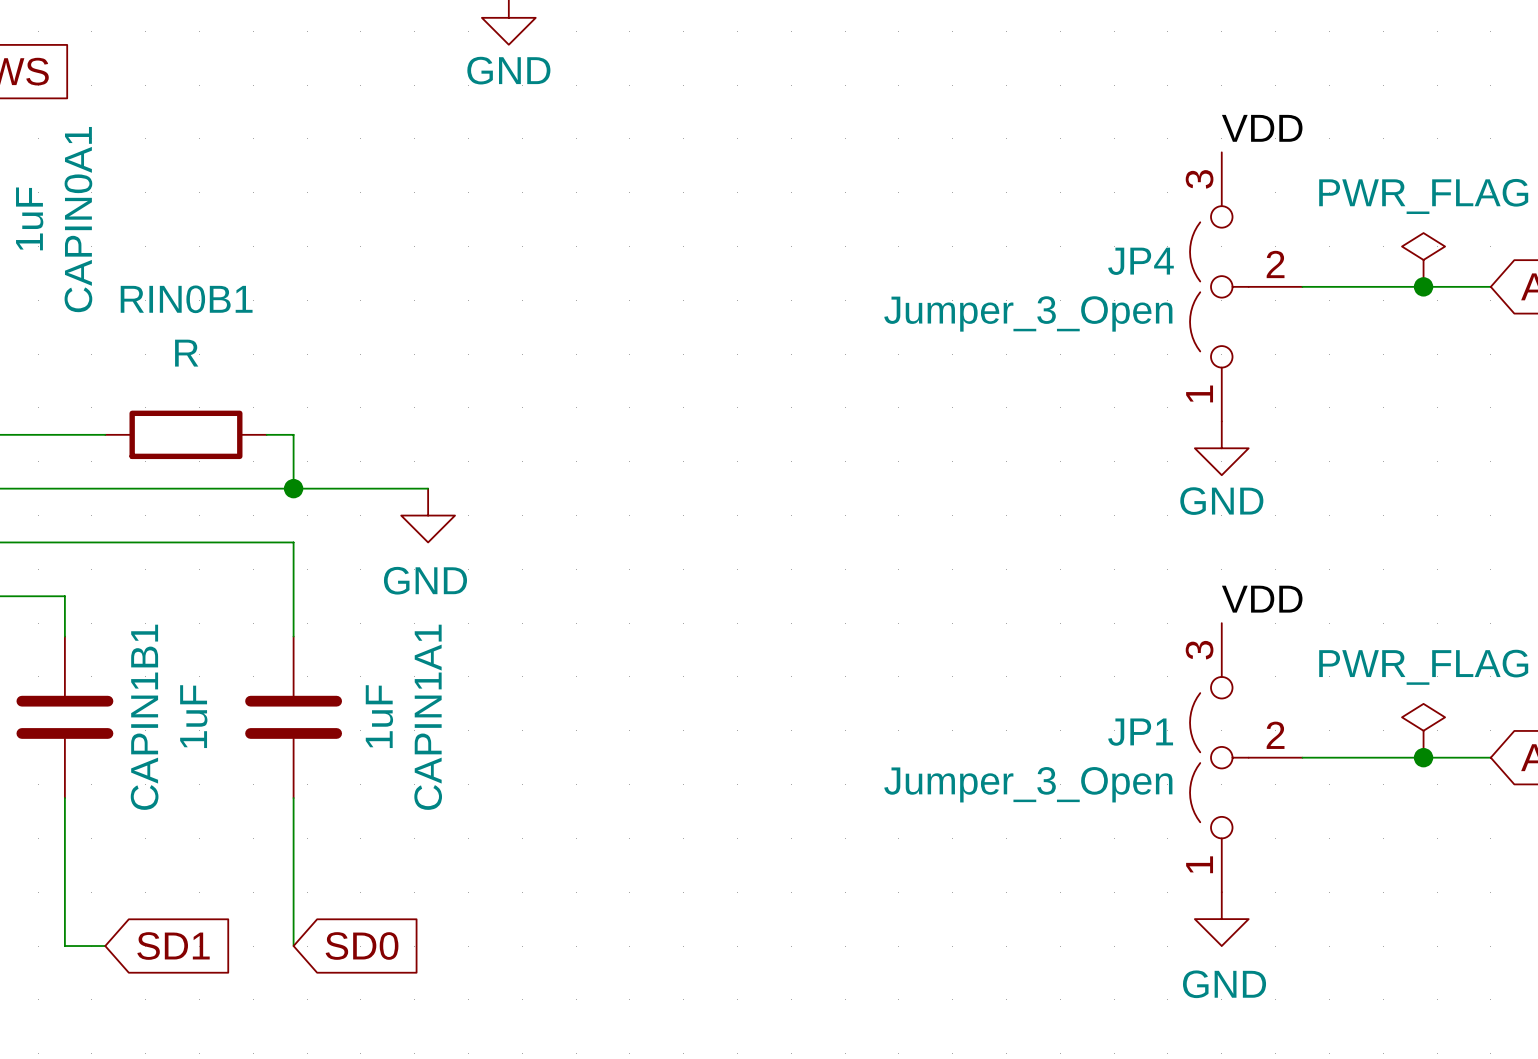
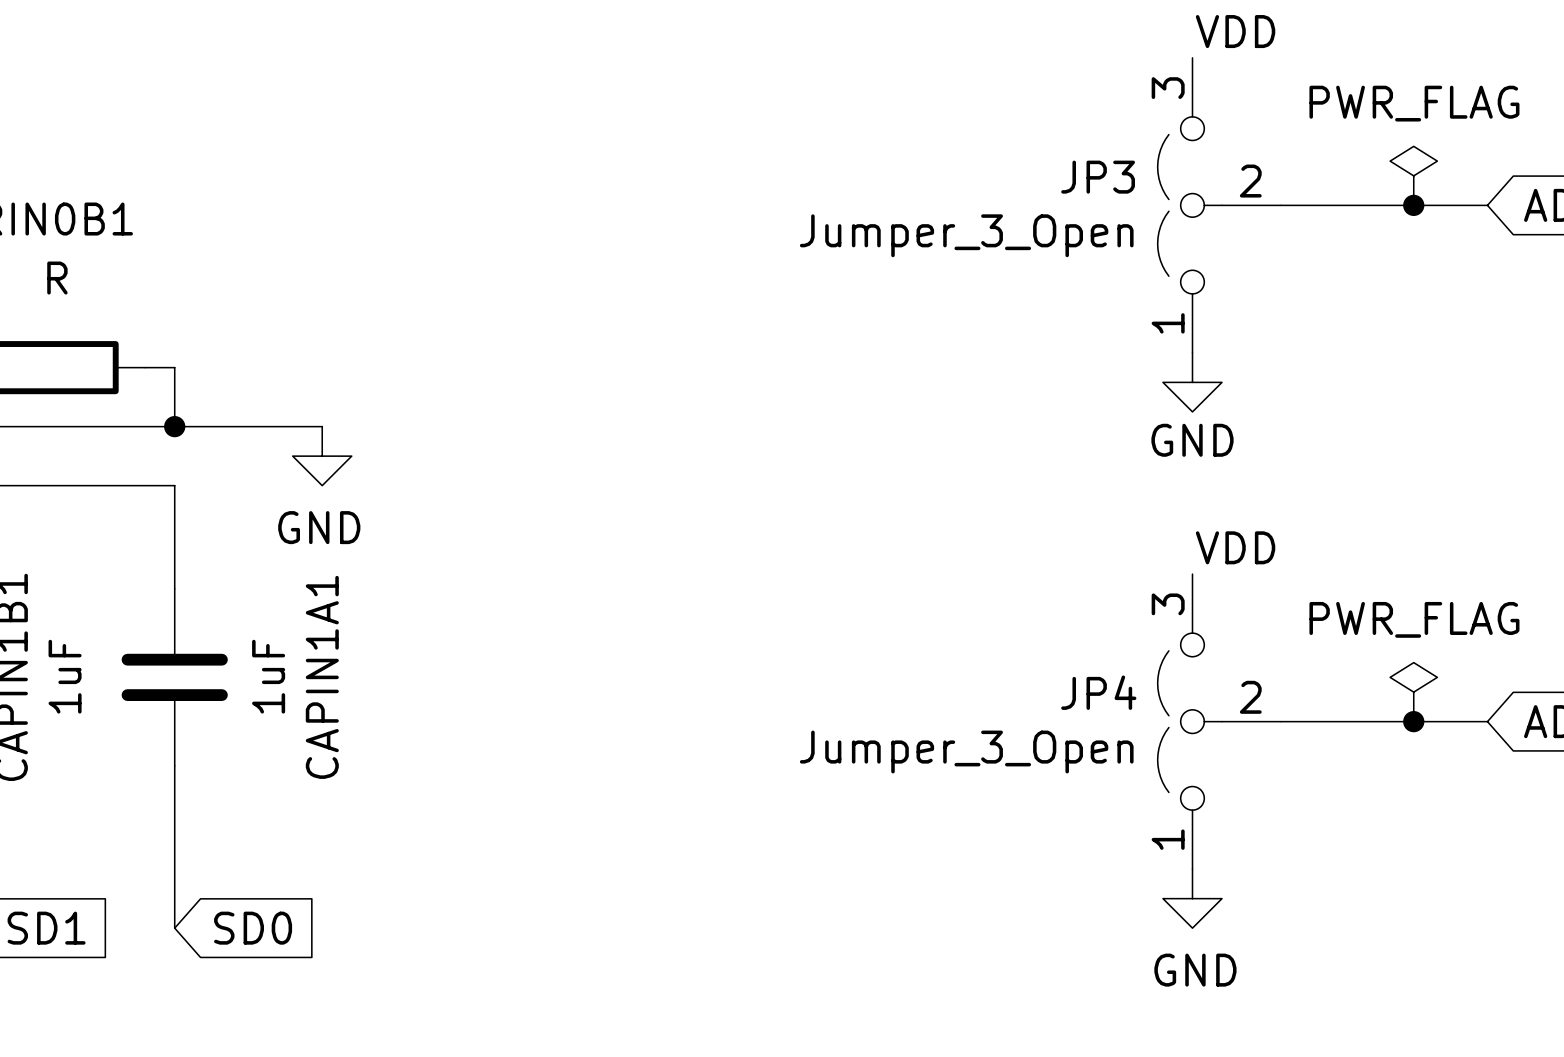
JP4 name: JP4 (1141, 261) -> JP3 (1098, 177)
JP1 name: JP1 (1140, 732) -> JP4 (1098, 692)

